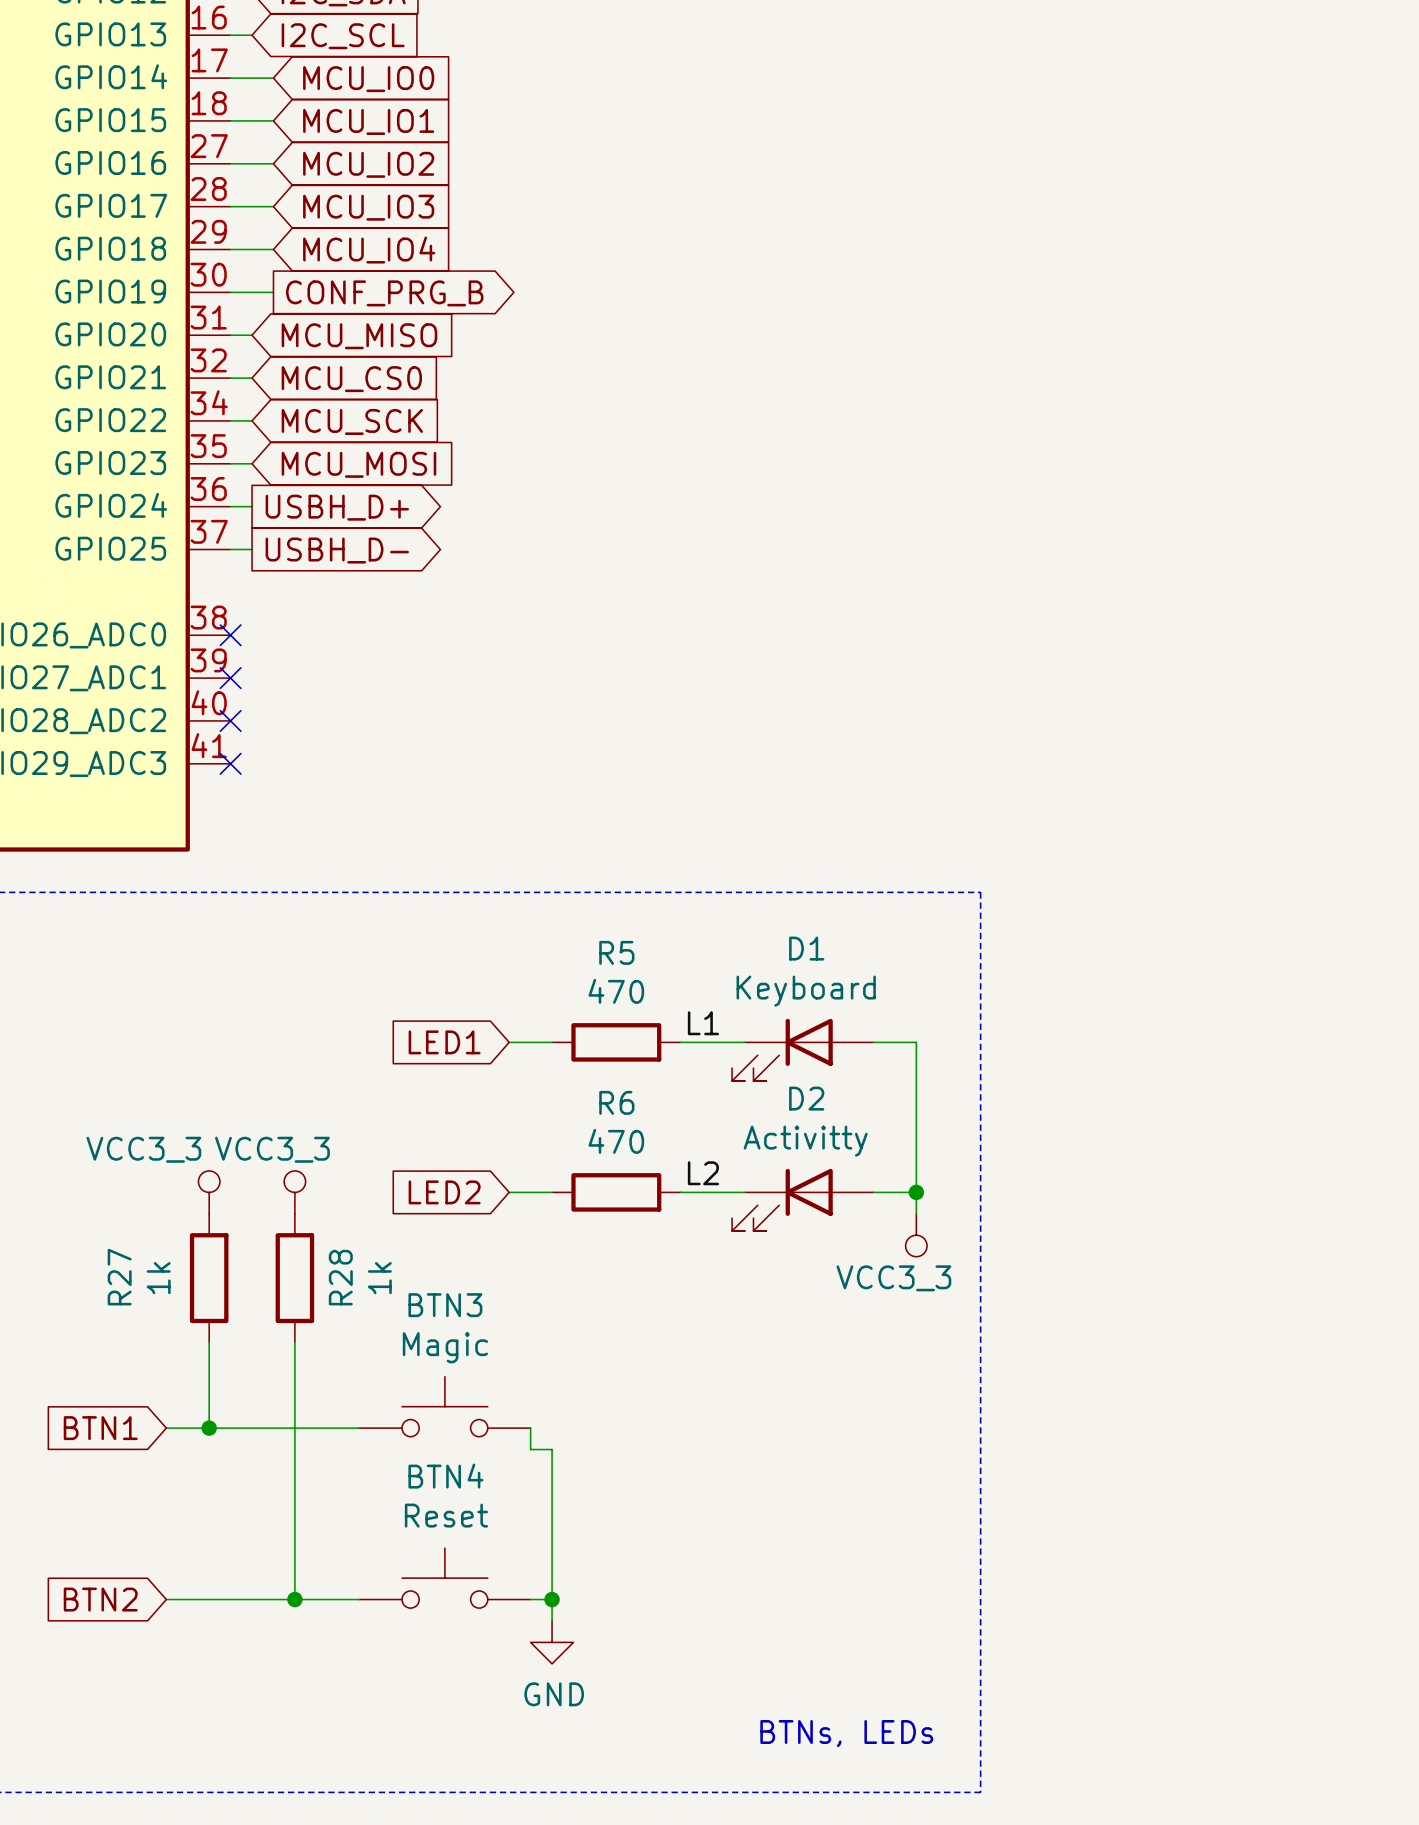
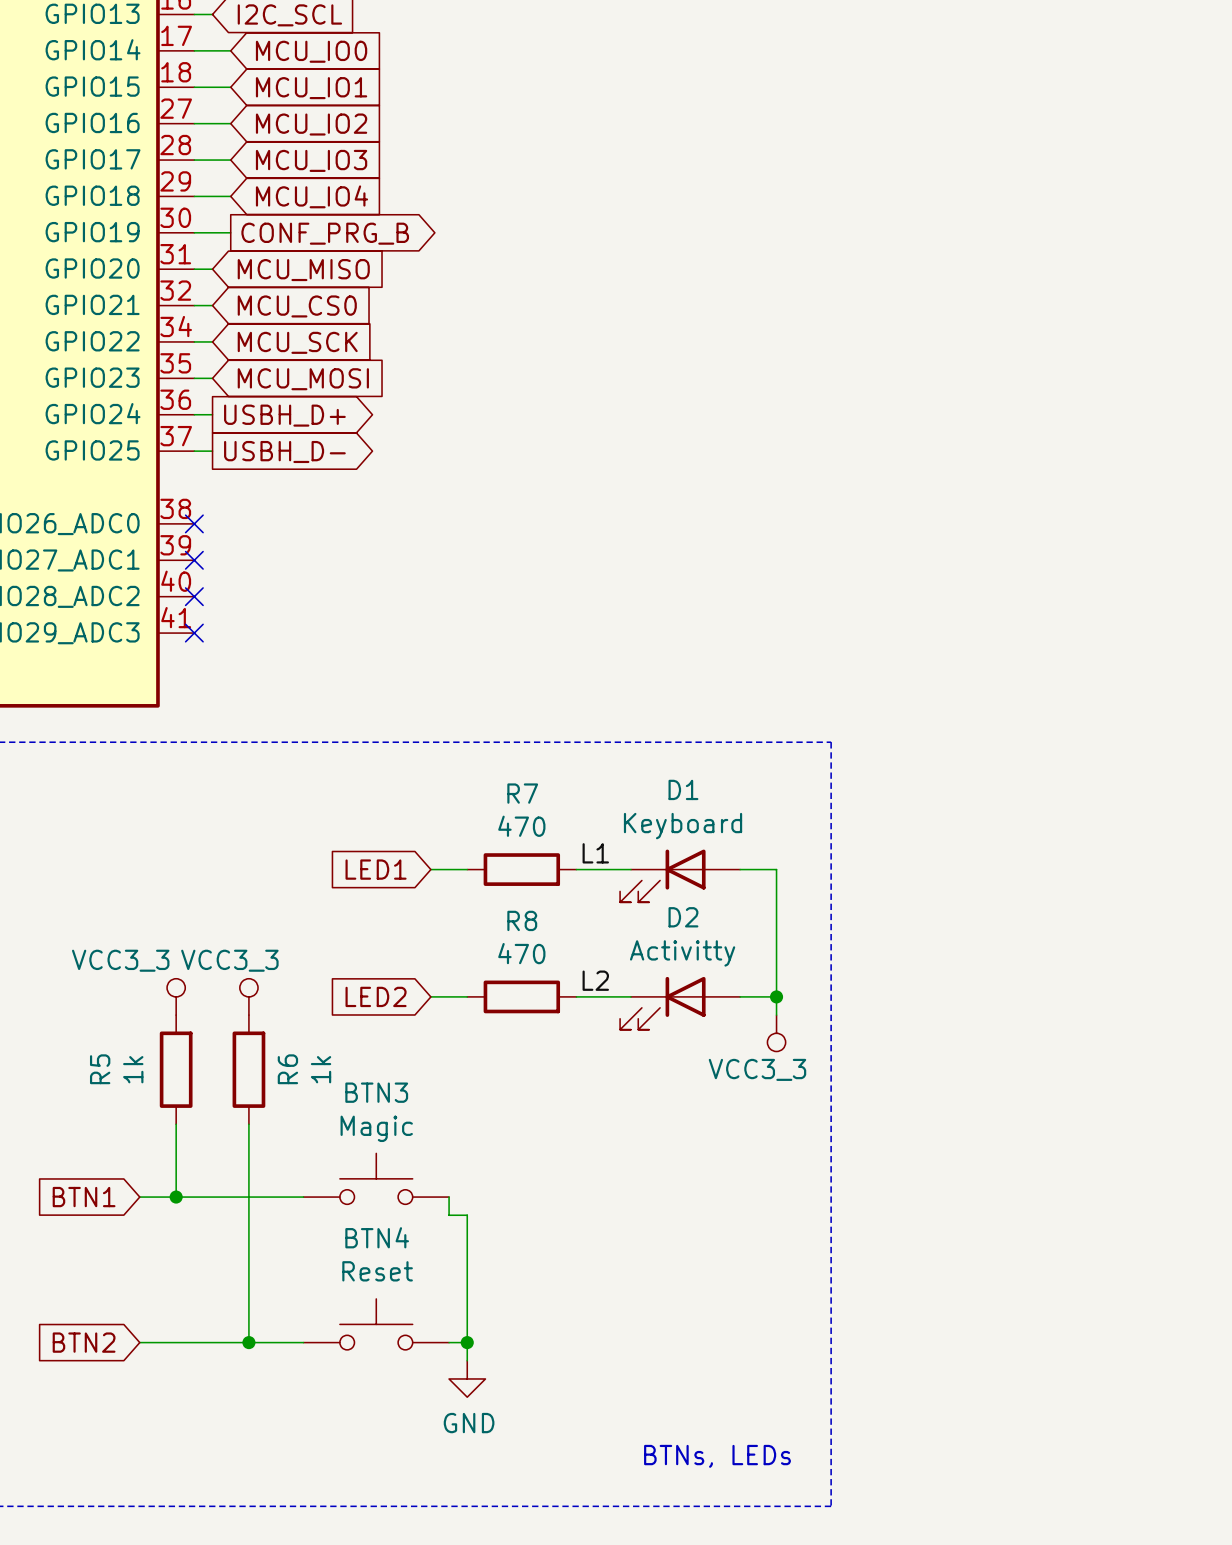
R5 name: R5 (616, 952) -> R7 (522, 793)
R6 name: R6 (616, 1102) -> R8 (522, 920)
R27 name: R27 (119, 1277) -> R5 (100, 1069)
R28 name: R28 (340, 1277) -> R6 (287, 1069)

